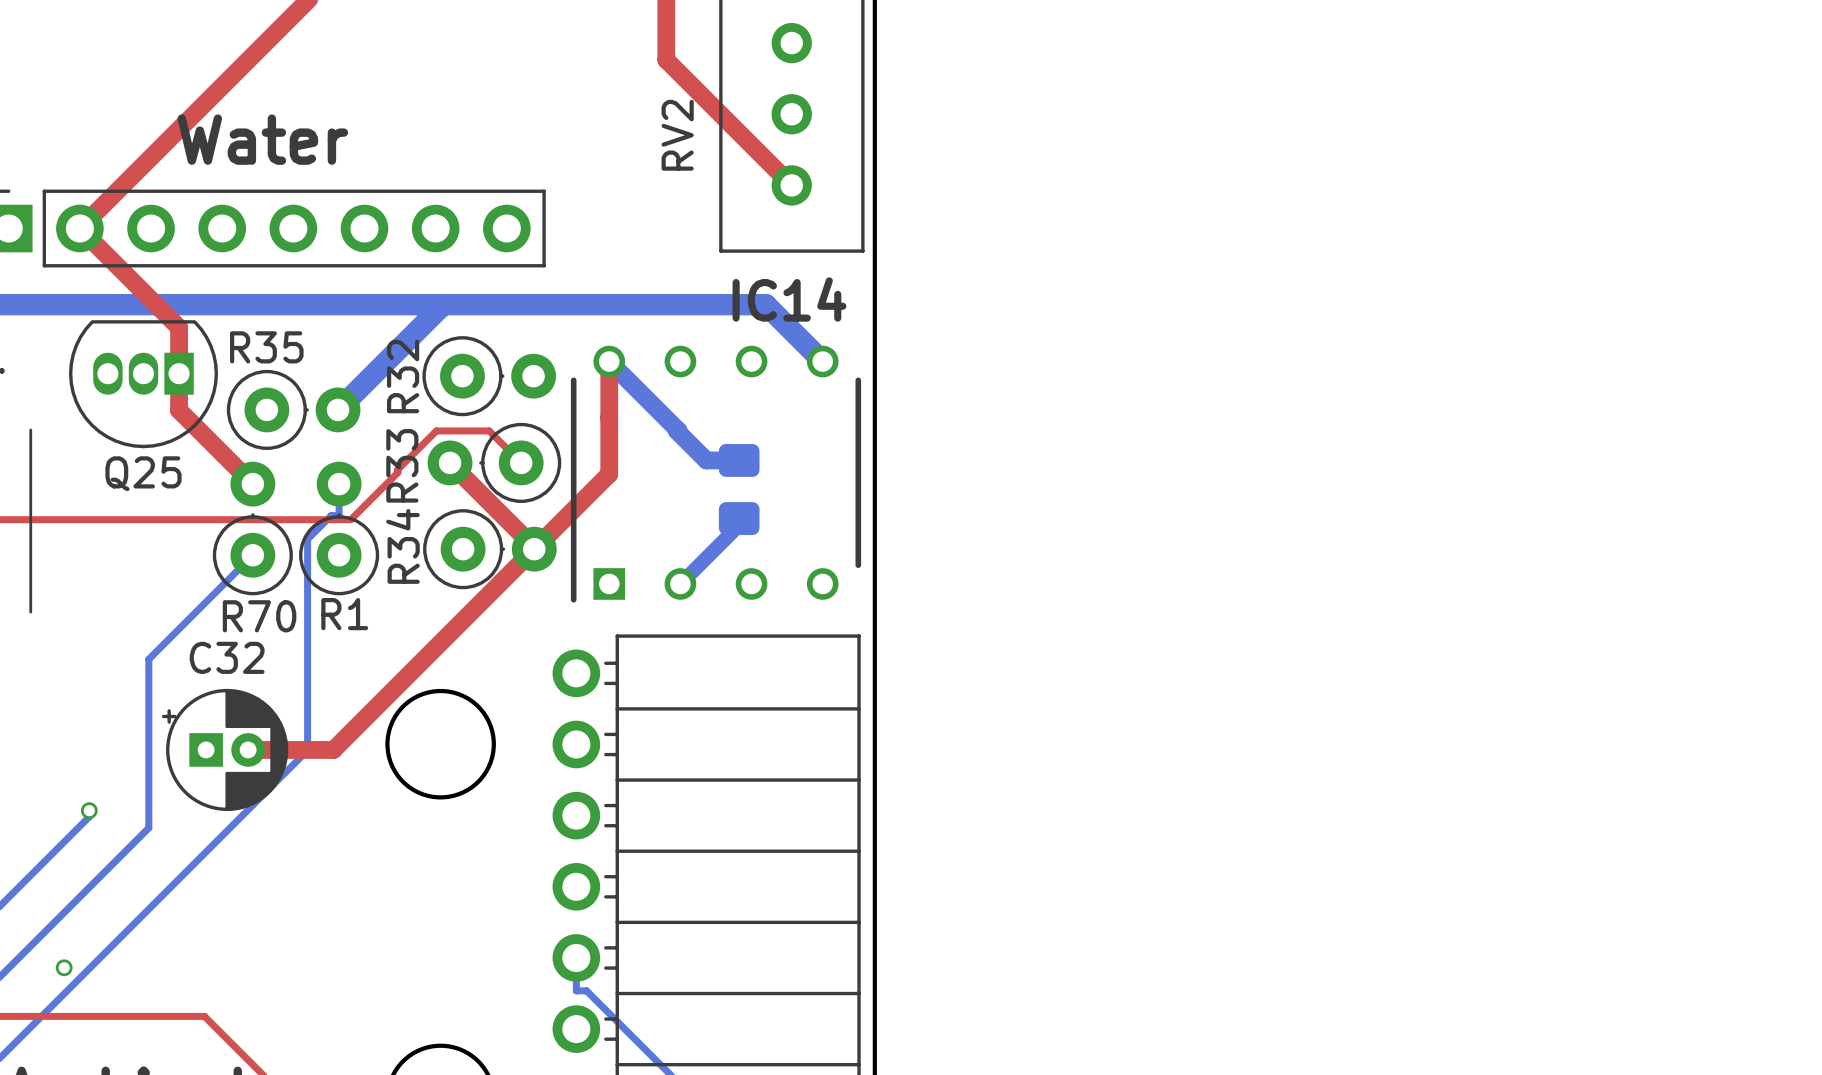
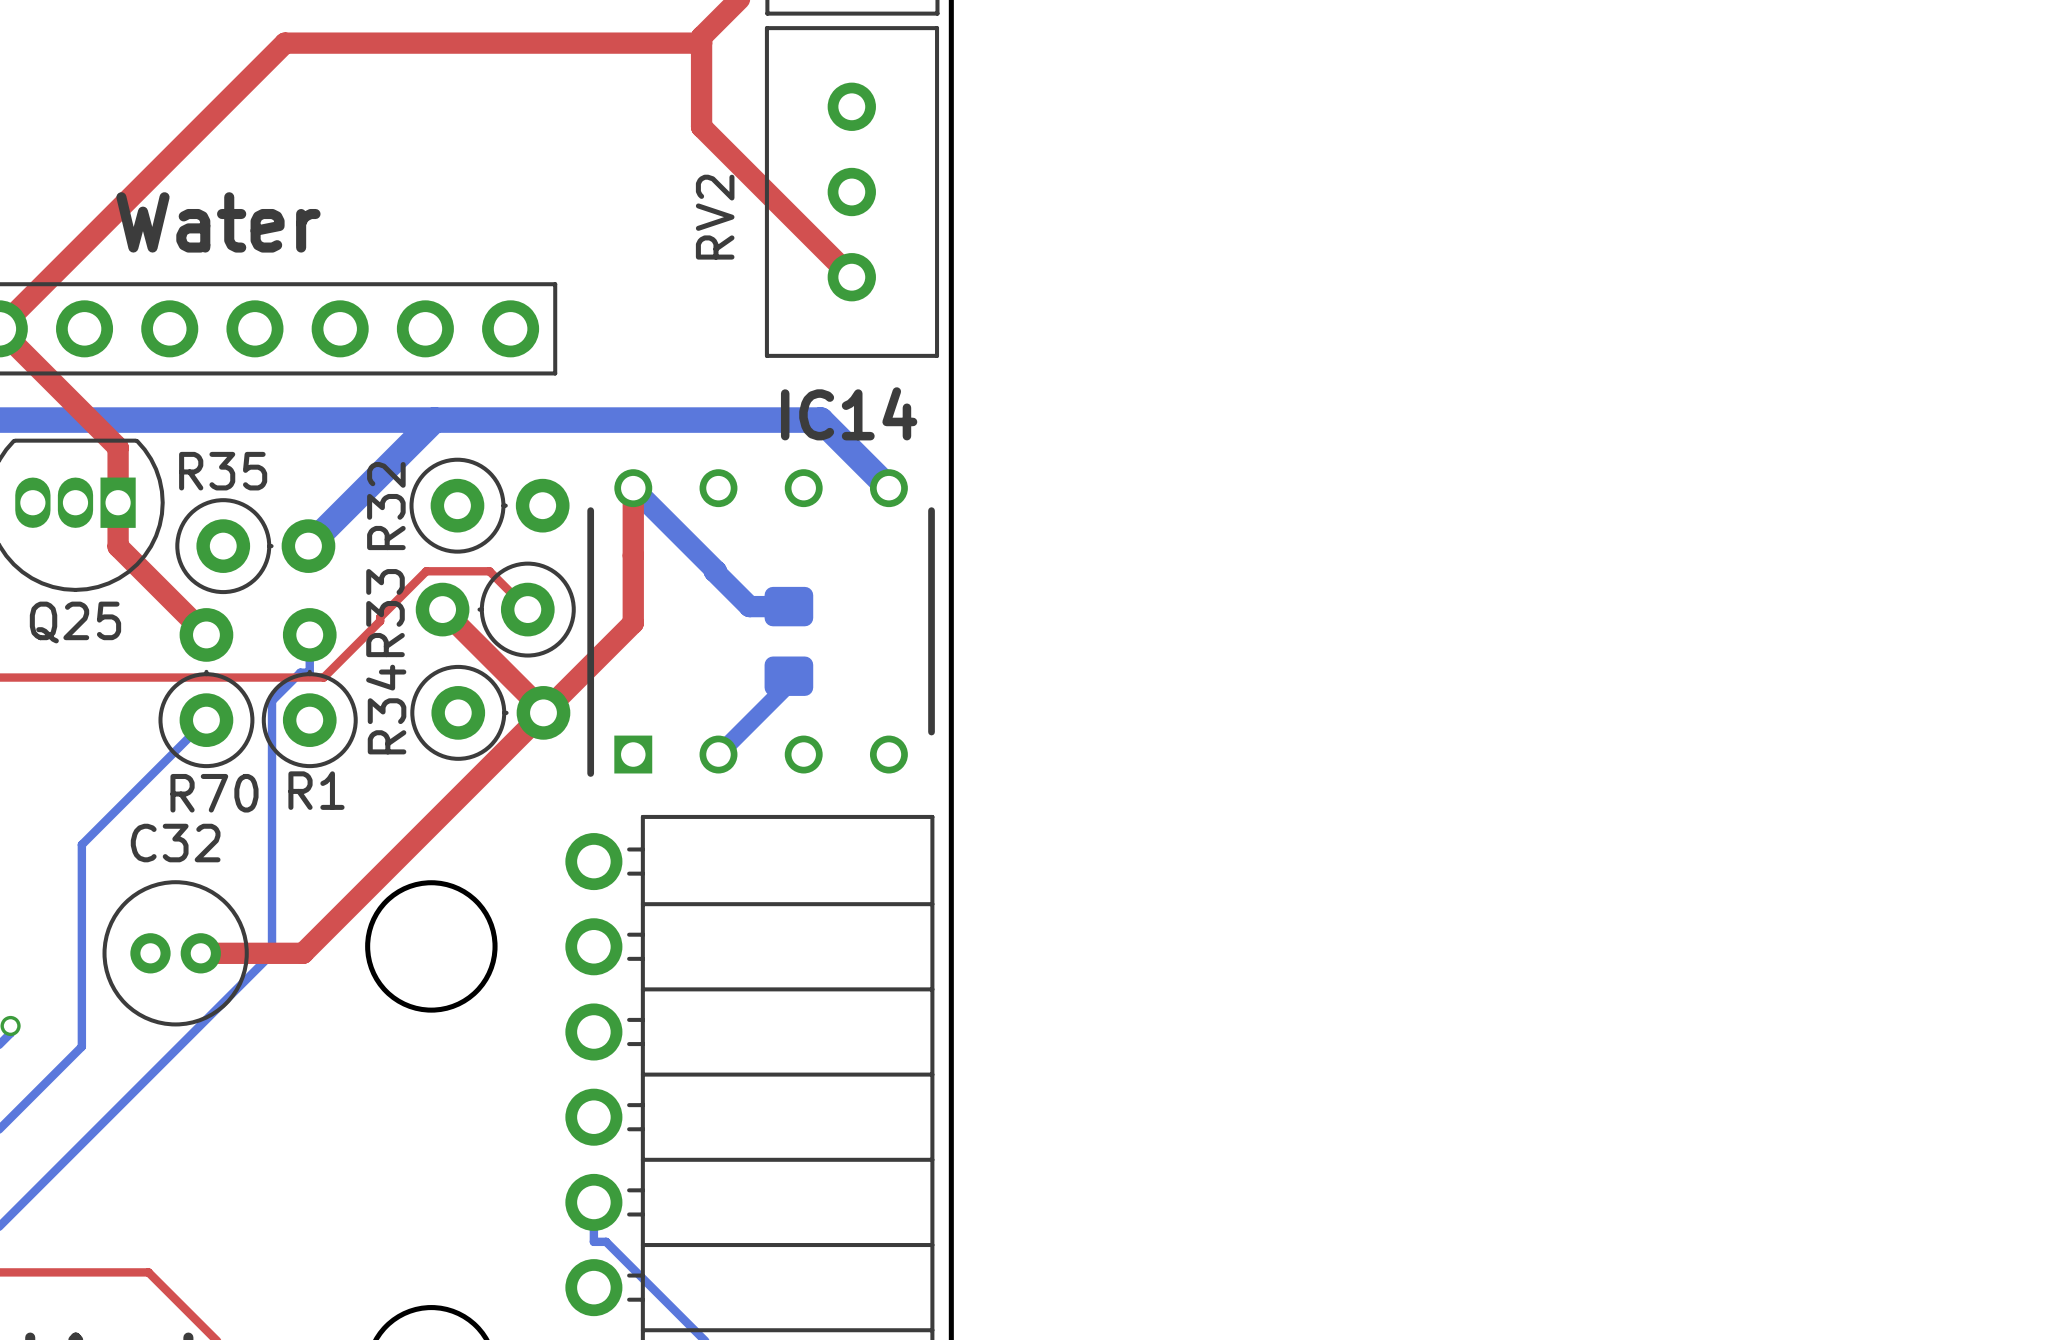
C32 footprint: [161, 688, 289, 812] -> [102, 880, 249, 1027]

